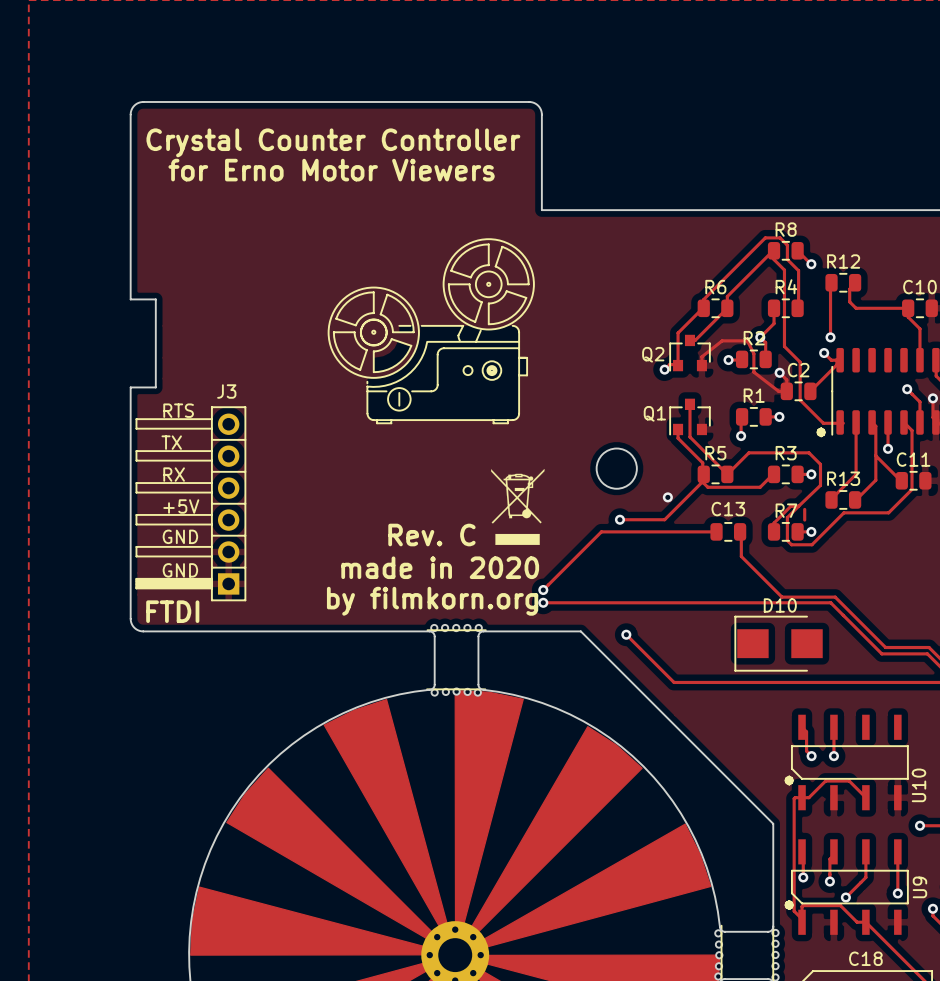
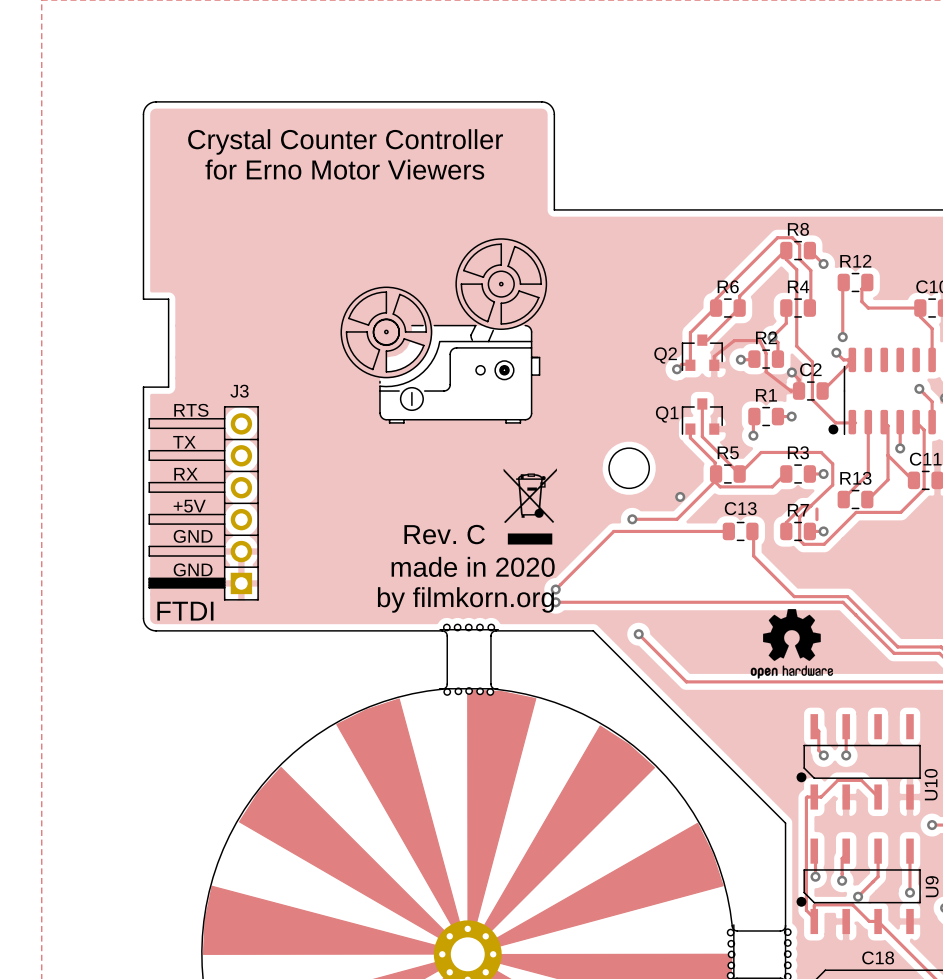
drawing: none -> [750, 609, 834, 679]
D10: (778, 643) -> none

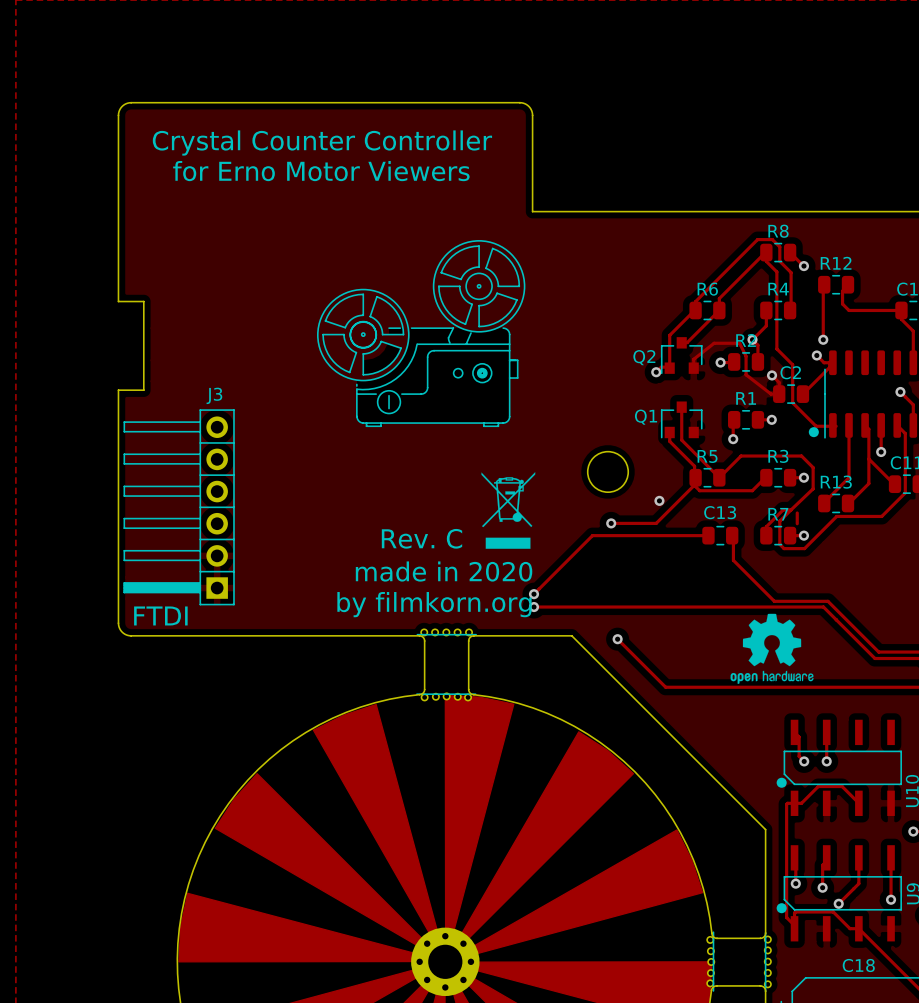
text: RTS (191, 410) -> none
text: TX (184, 442) -> none
text: RX (186, 474) -> none
text: +5V (189, 506) -> none
text: GND (193, 536) -> none
text: GND (193, 569) -> none

